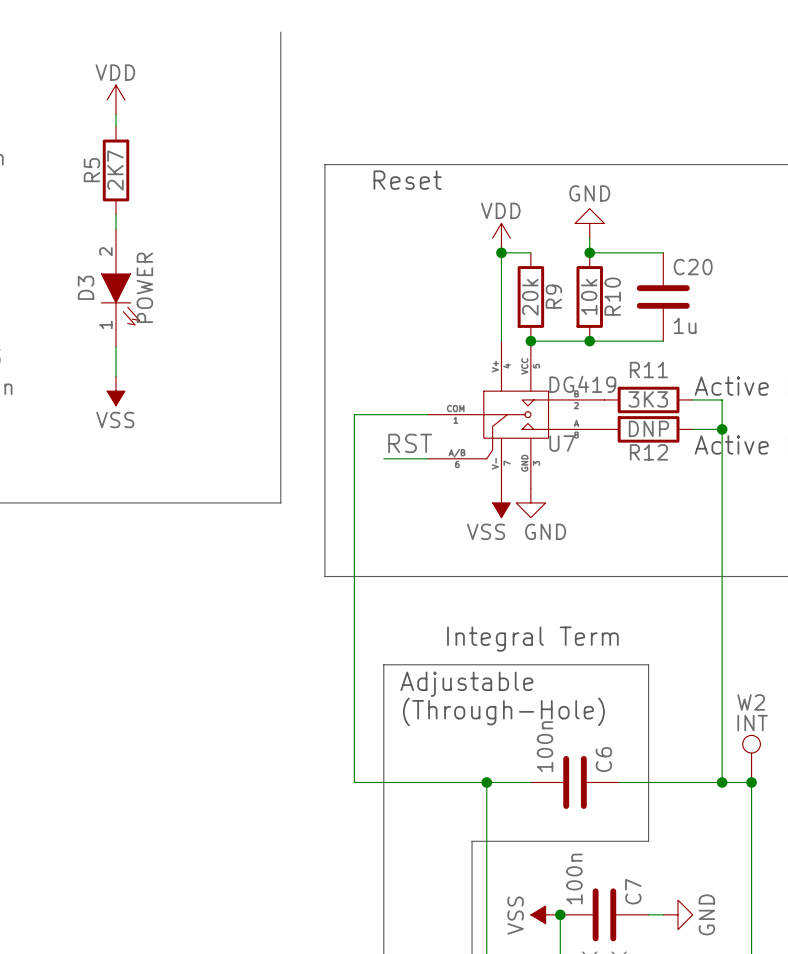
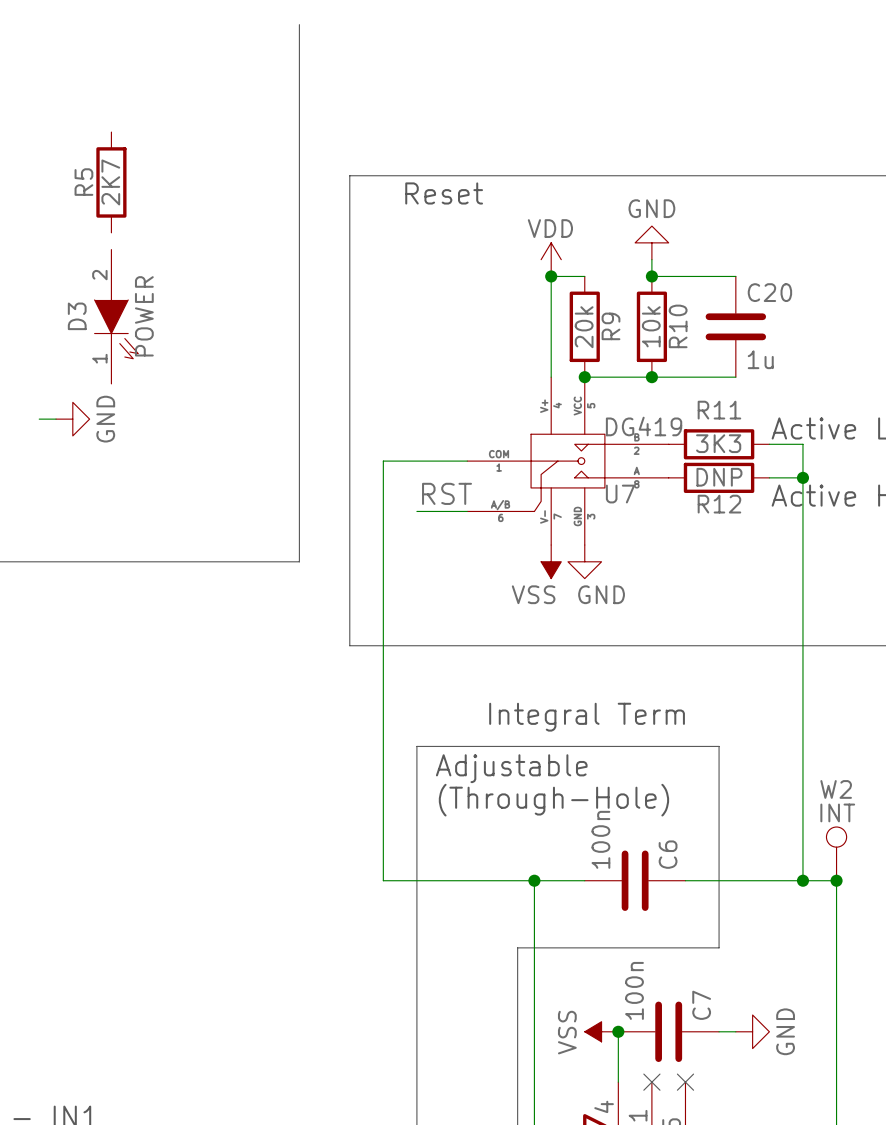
power symbol: VDD (116, 99) -> none
wire: (116, 114) (116, 126) -> none
wire: (116, 214) (116, 229) -> none
wire: (116, 347) (116, 376) -> none
wire: none -> (39, 419) (56, 419)
power symbol: none -> GND (72, 419)
power symbol: VSS (116, 391) -> none

